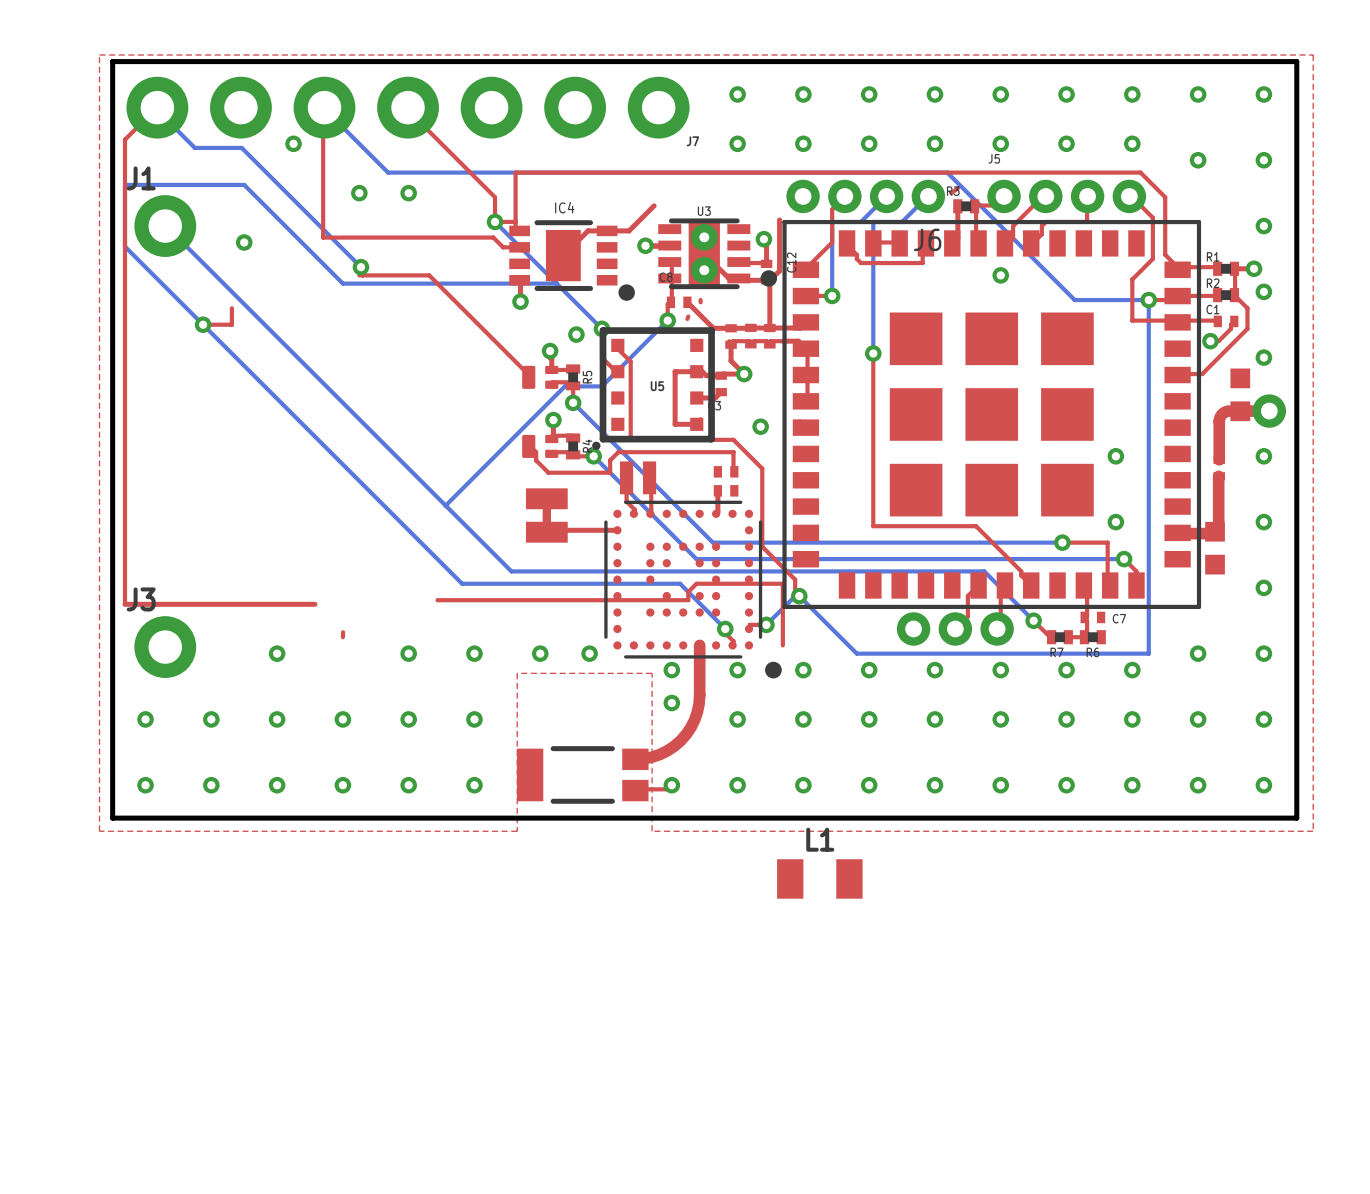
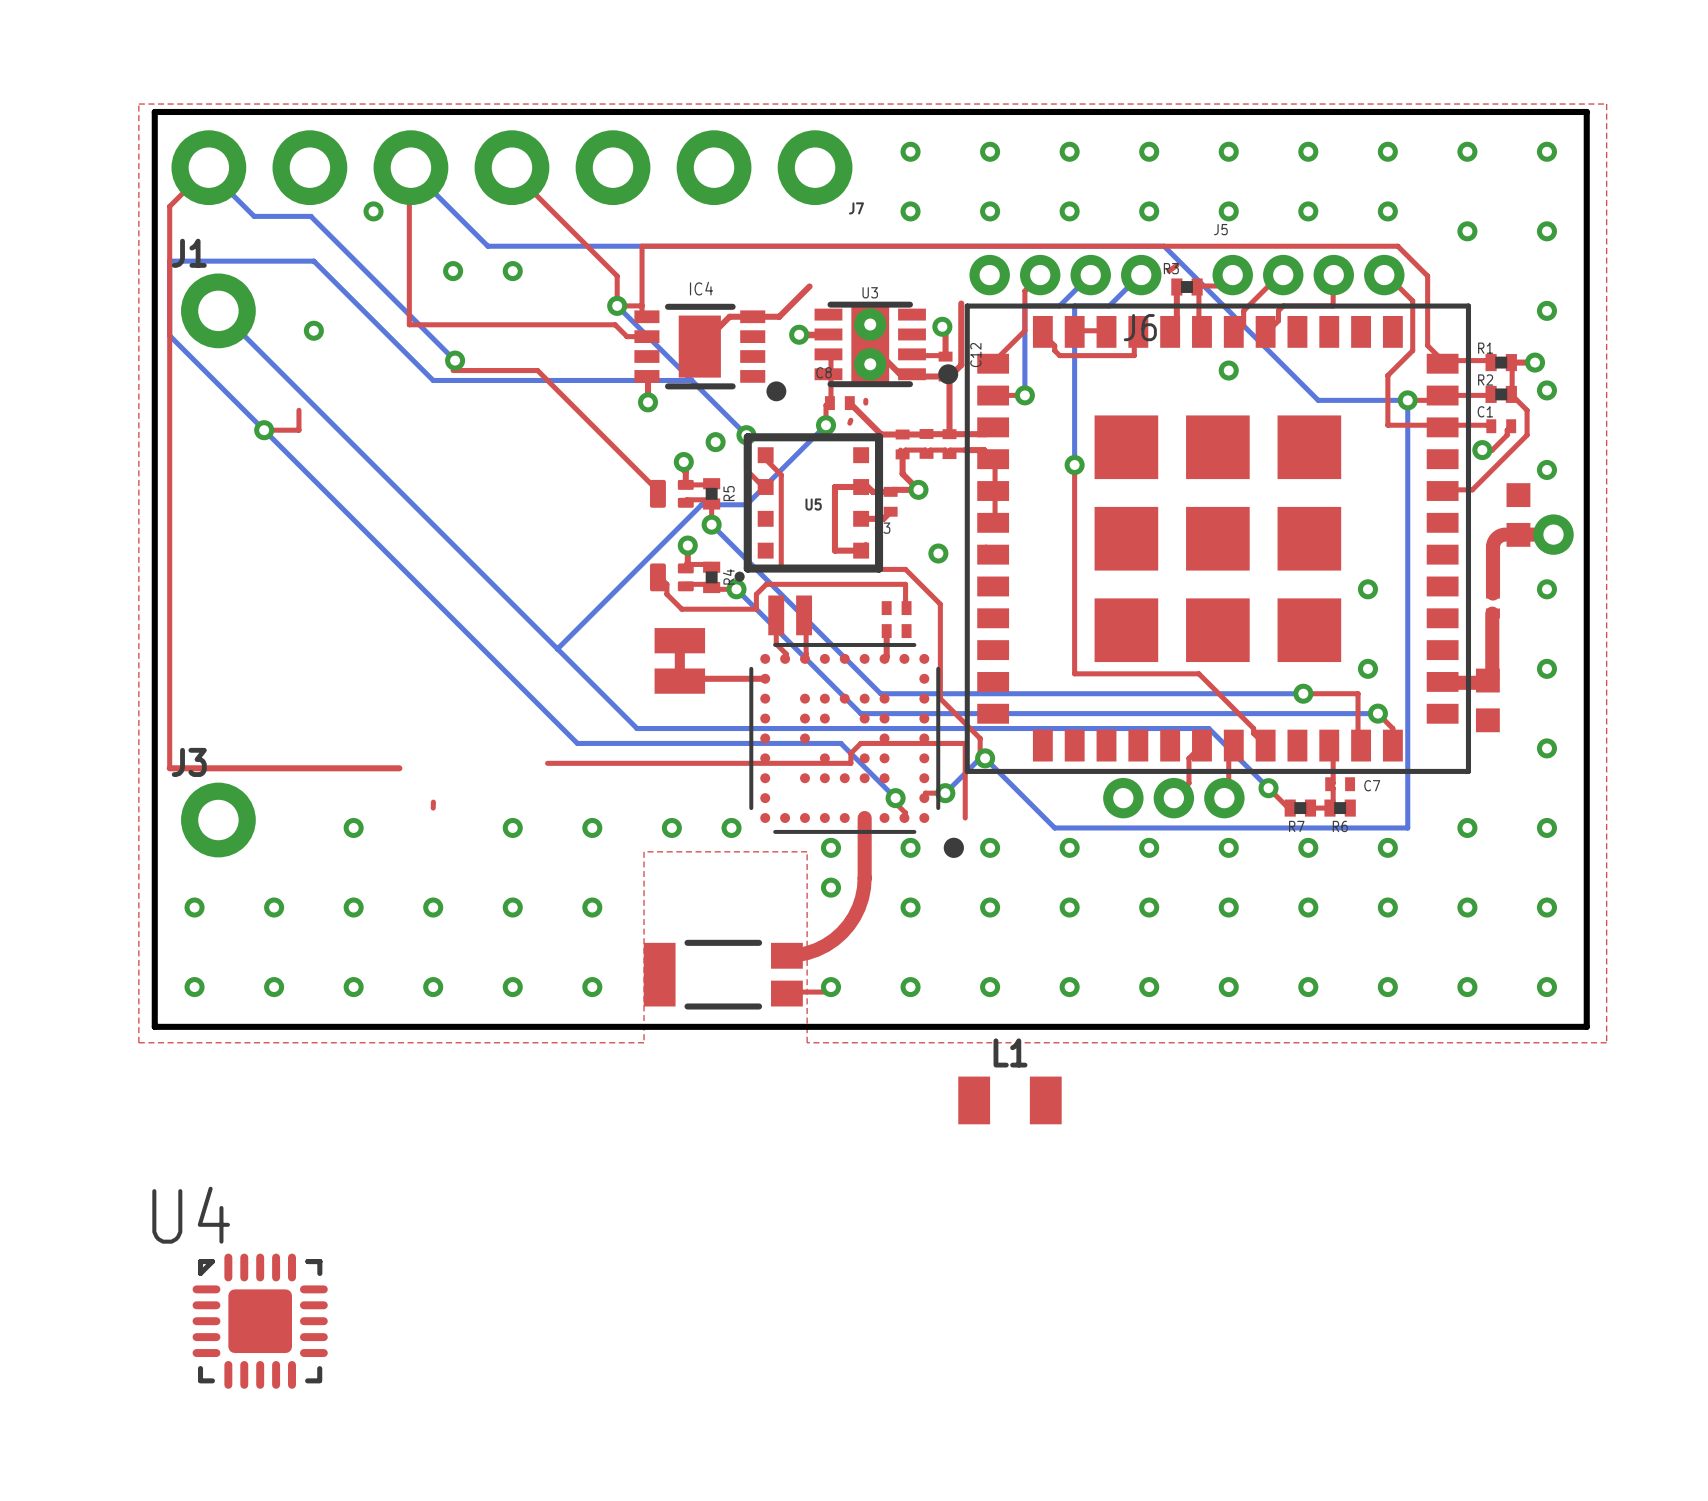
U4: none -> (260, 1321)

